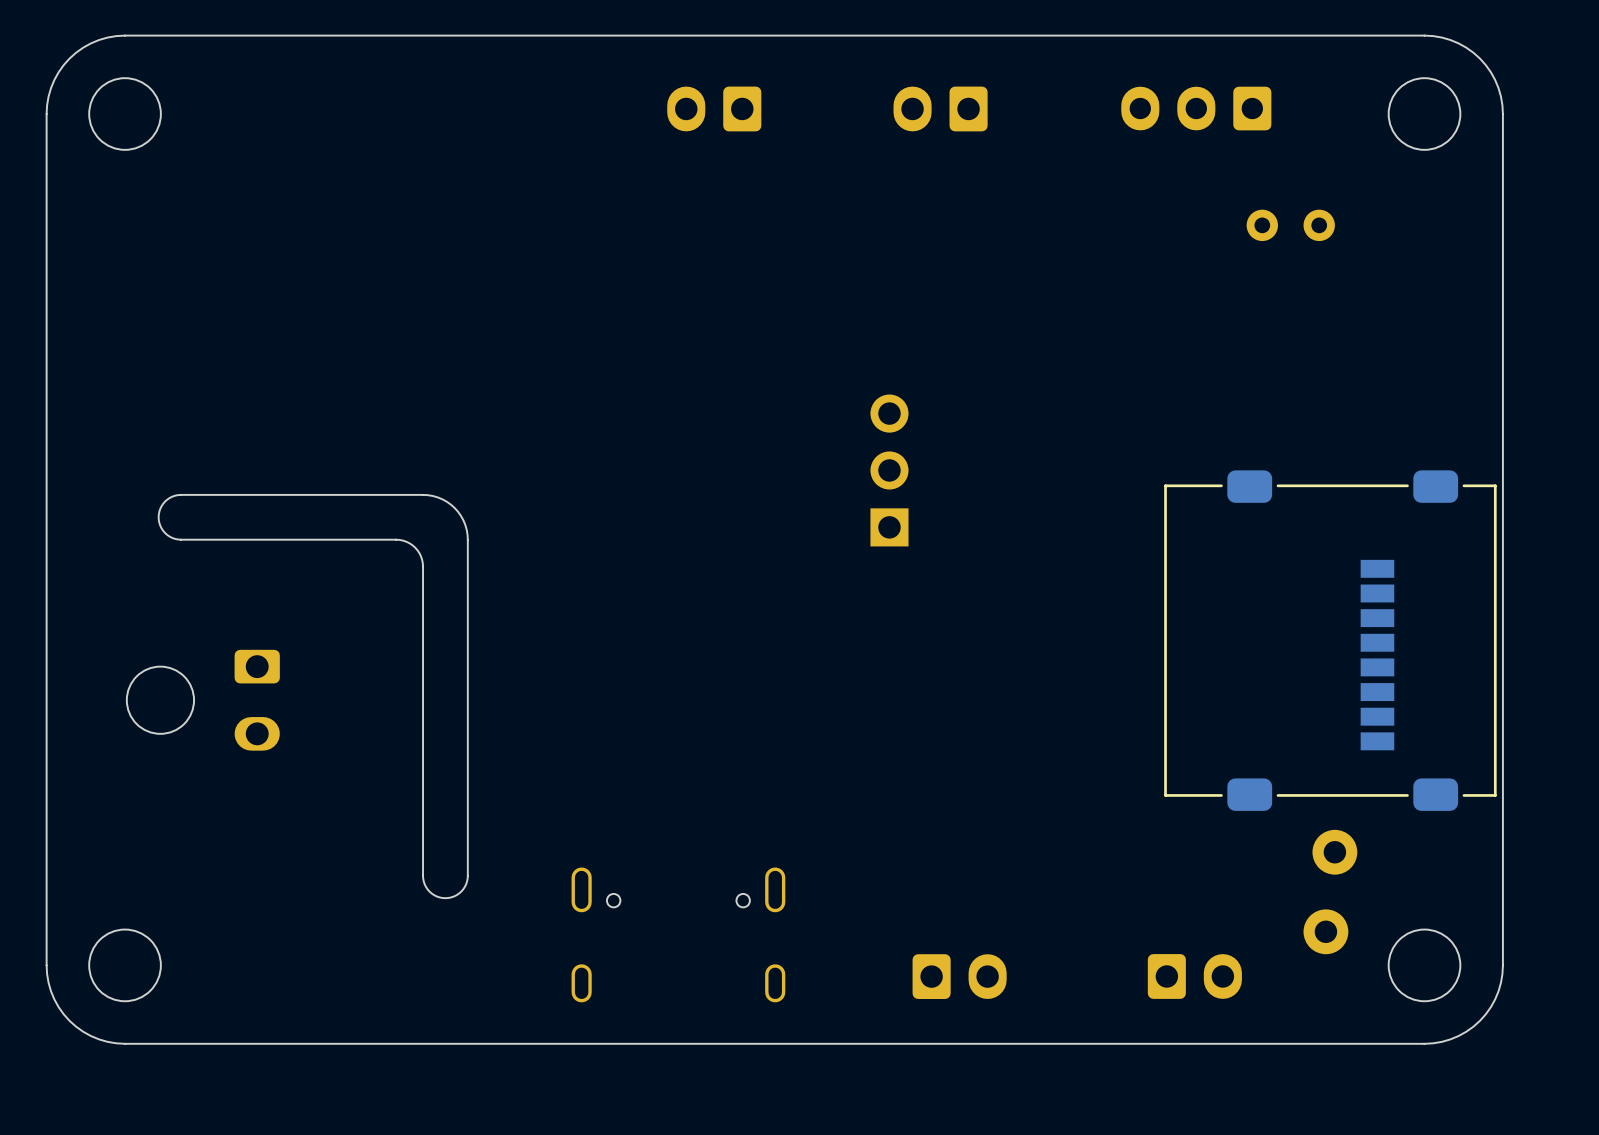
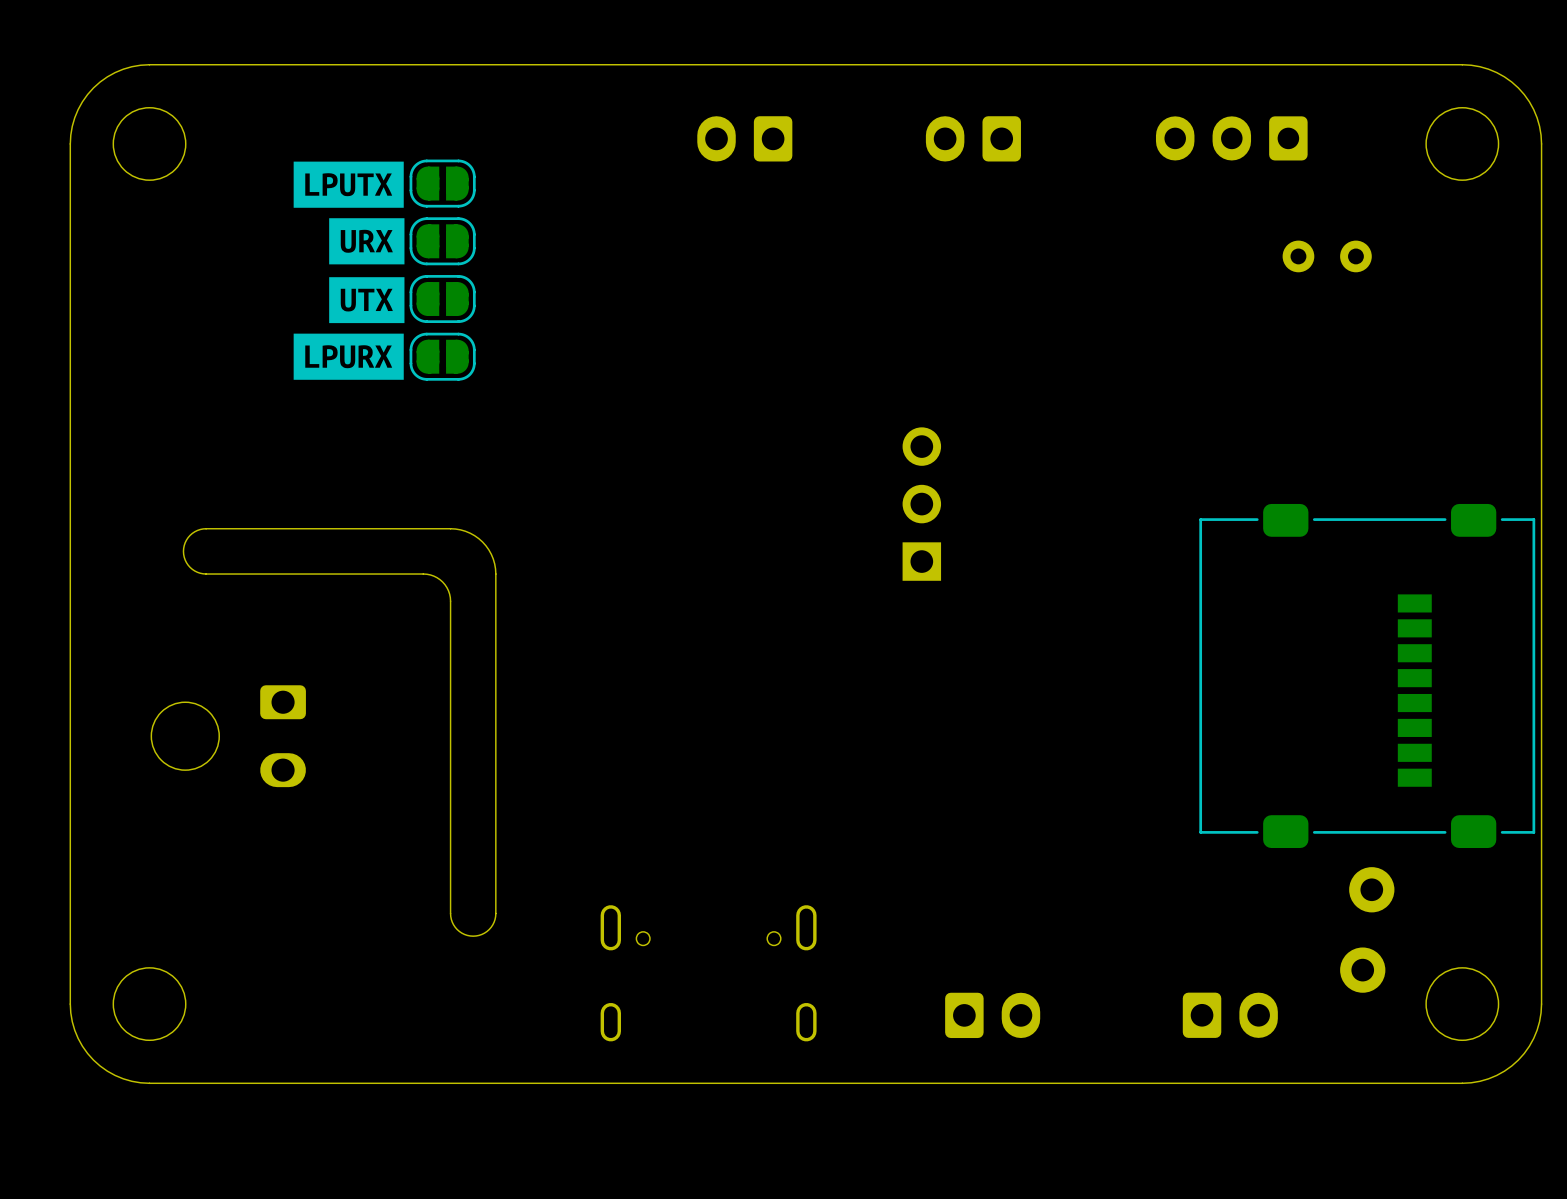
drawing: none -> [293, 161, 405, 380]
part: none -> (442, 183)
part: none -> (442, 241)
part: none -> (442, 299)
part: none -> (442, 356)

